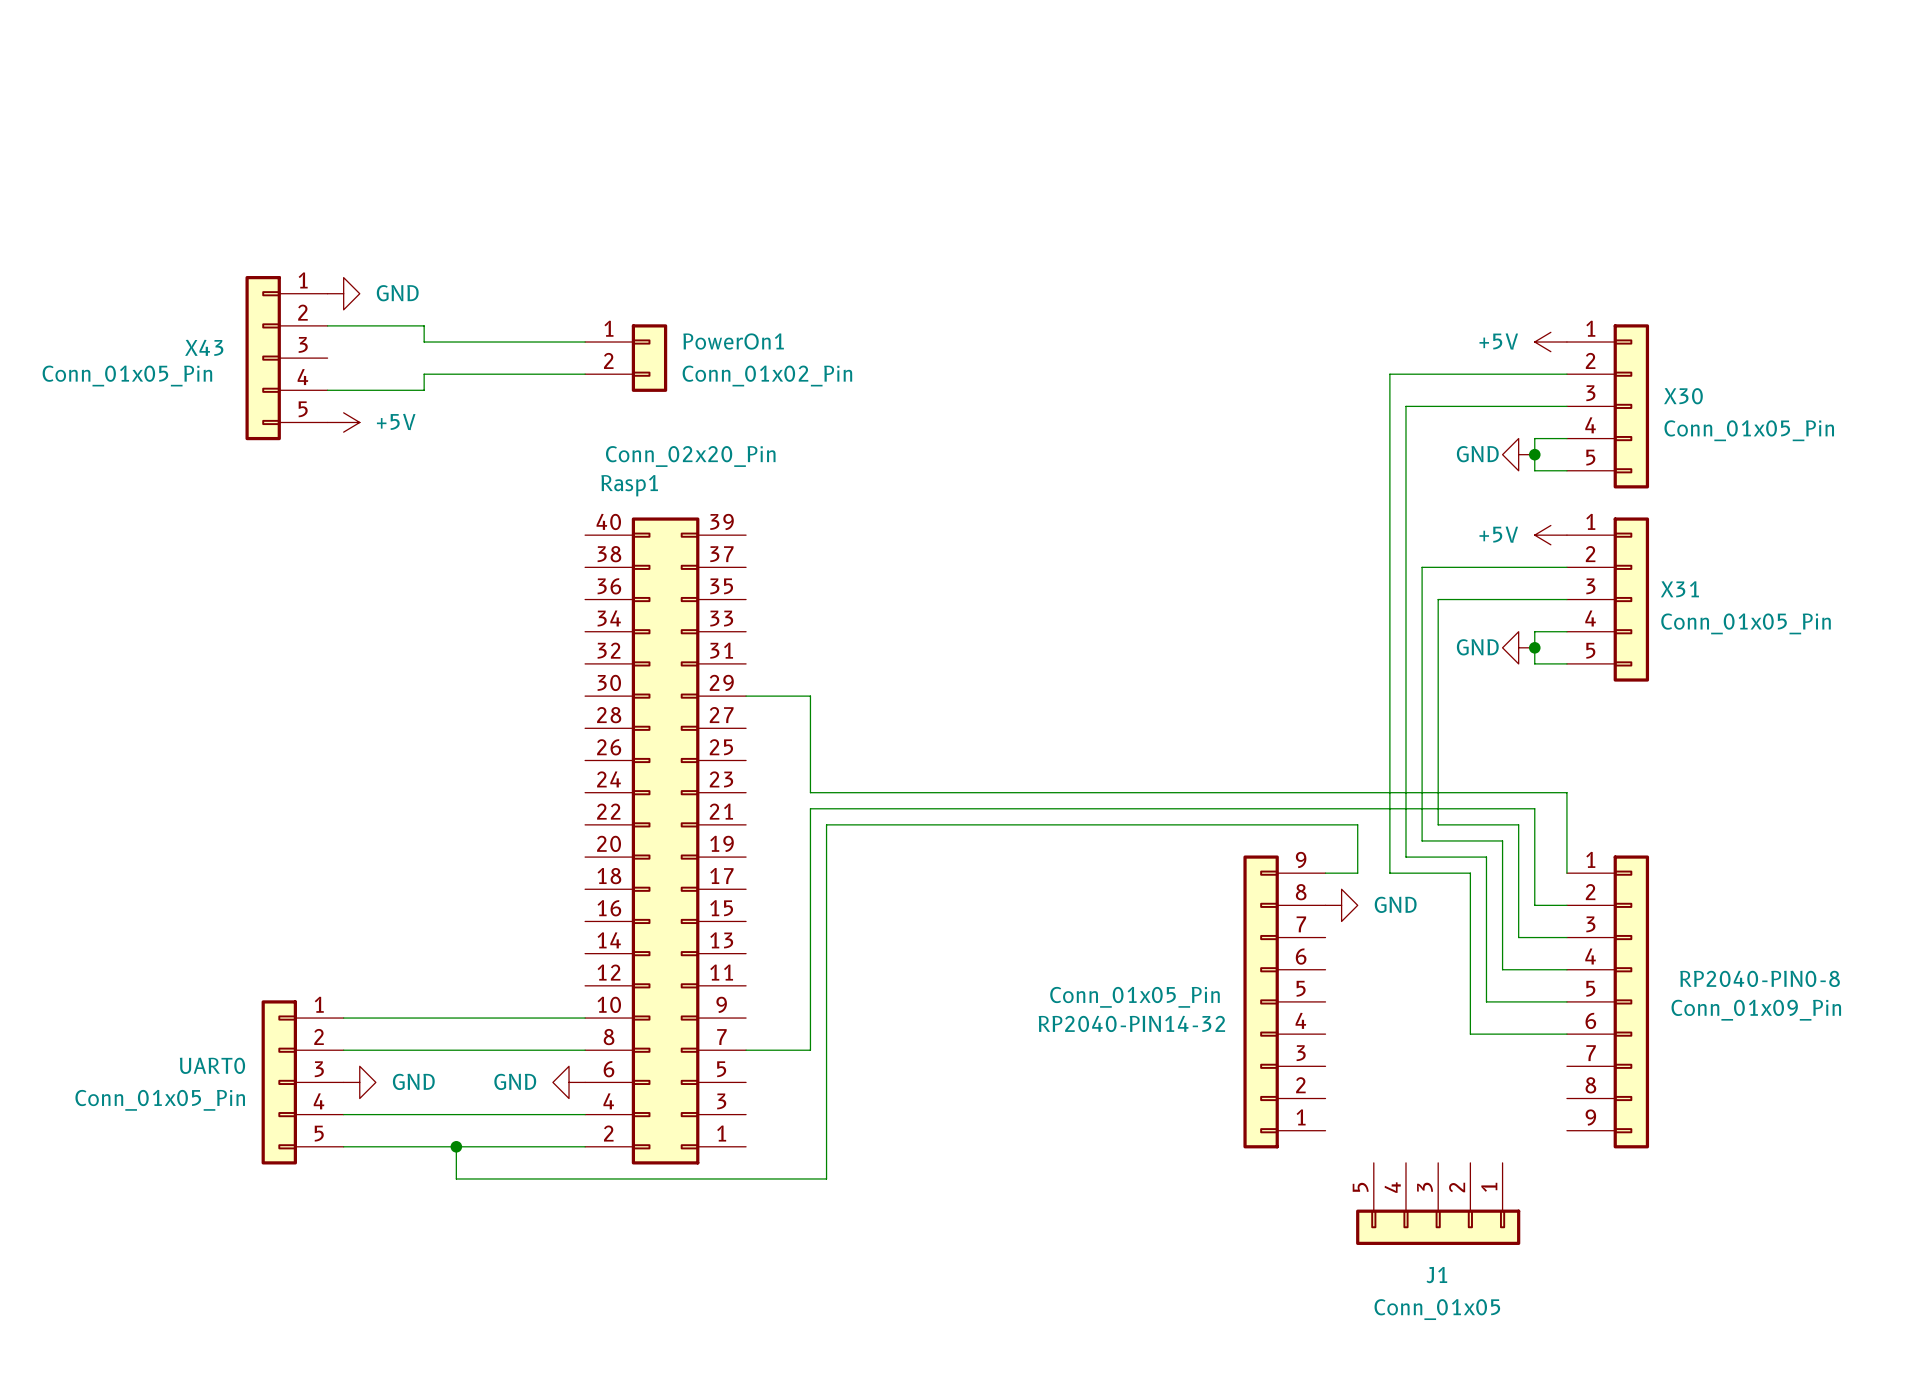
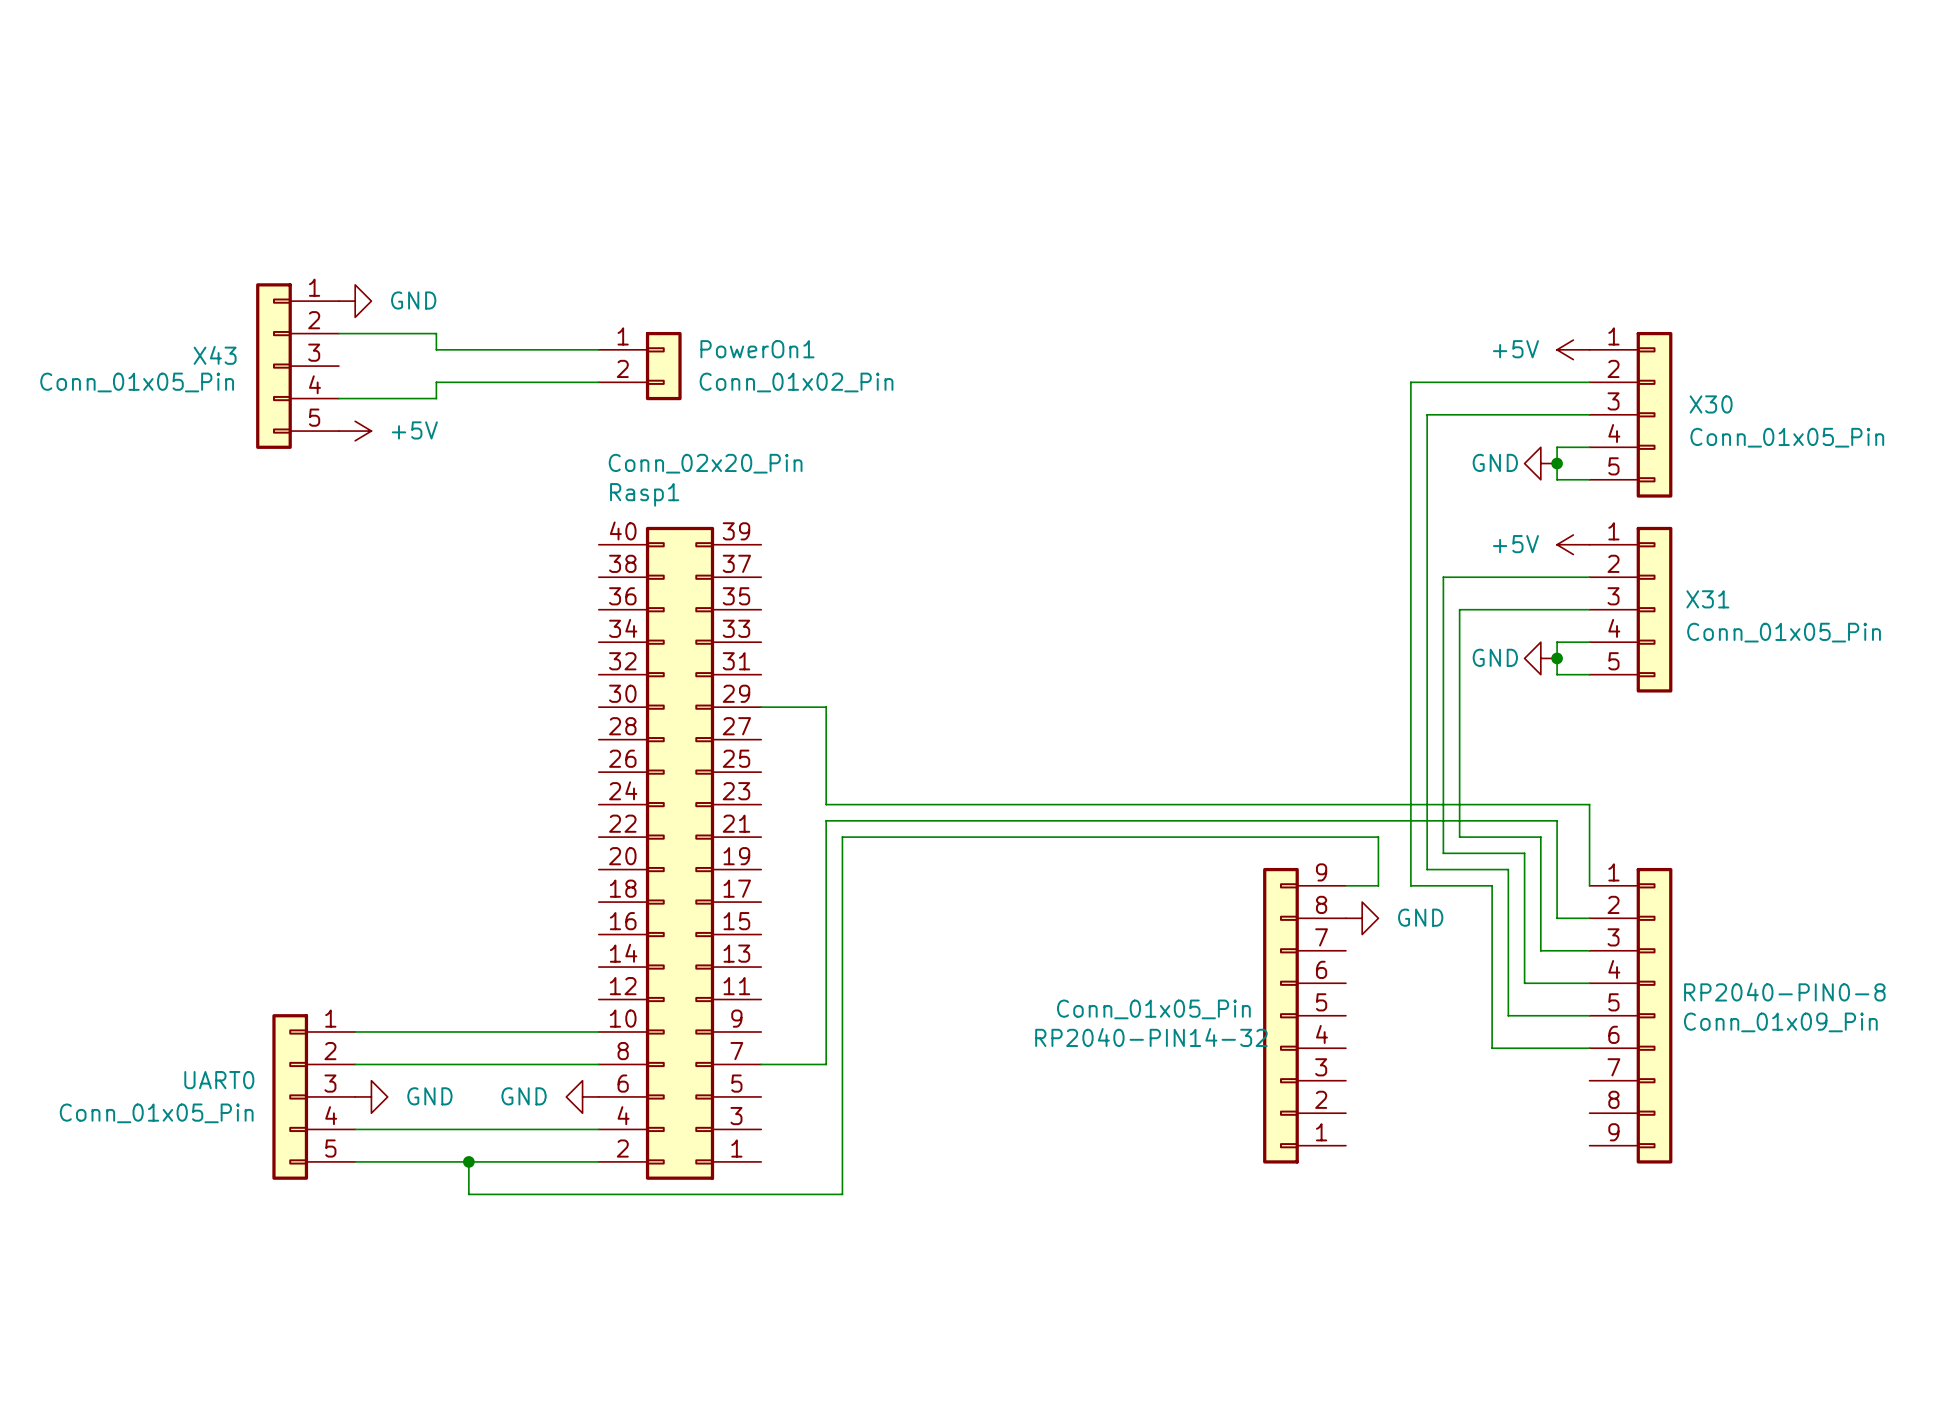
J1: Conn_01x05 (1438, 1203) -> none

